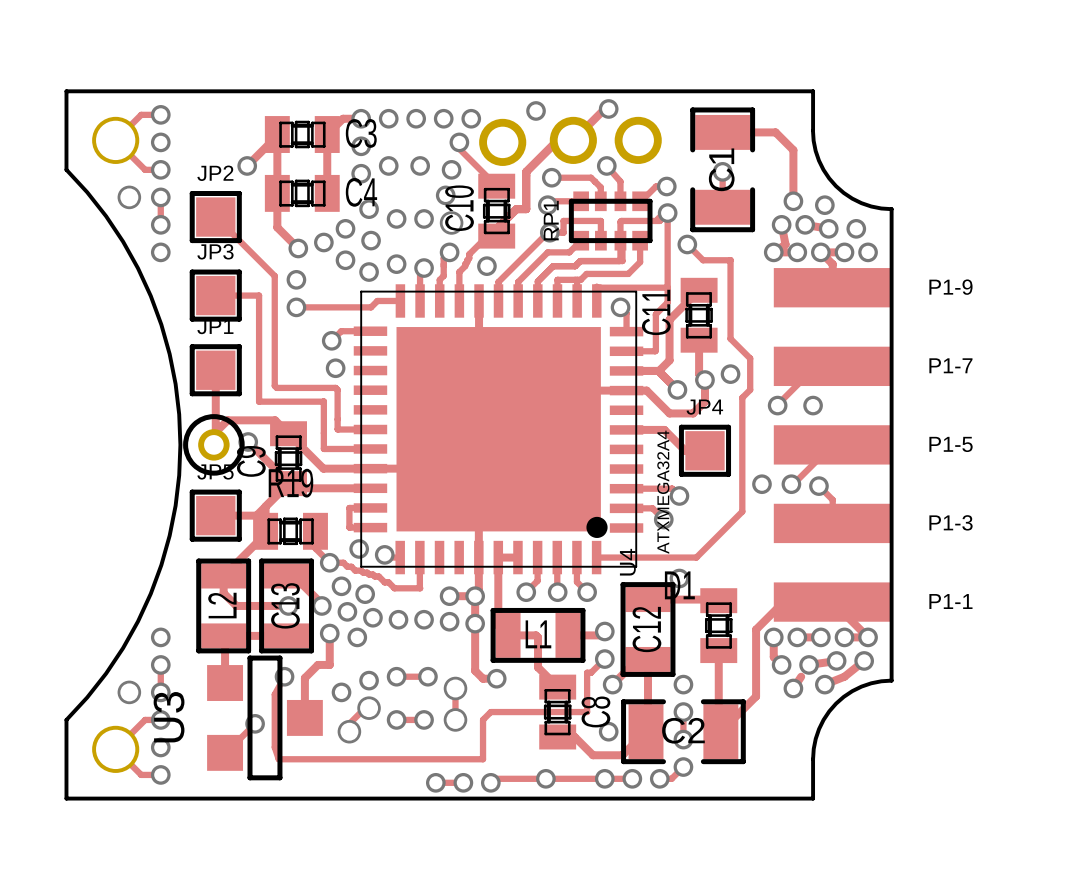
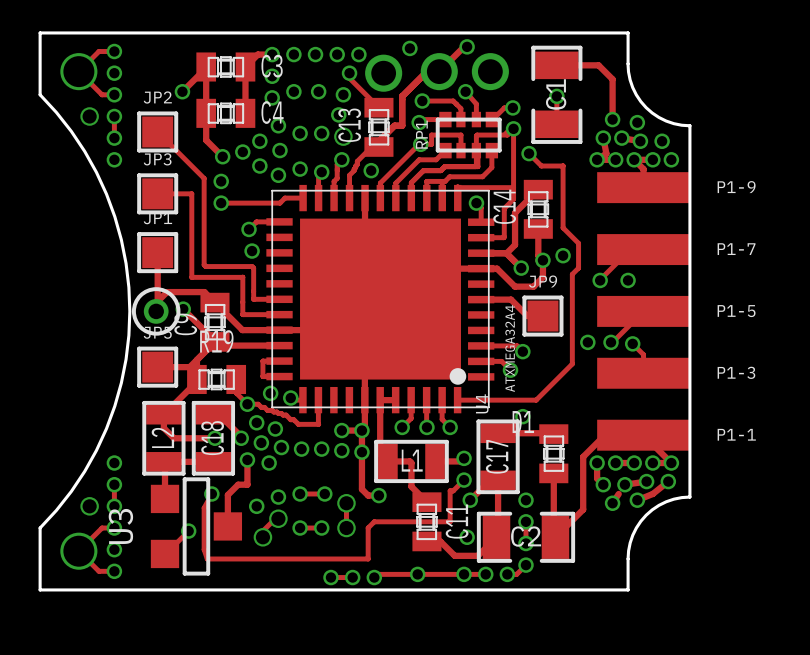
C10 name: C10 (459, 208) -> C13 (349, 125)
C11 name: C11 (656, 312) -> C14 (504, 206)
JP4 name: JP4 (704, 407) -> JP9 (543, 281)
C13 name: C13 (285, 605) -> C18 (212, 438)
C12 name: C12 (646, 629) -> C17 (497, 456)
C8 name: C8 (595, 711) -> C11 (457, 521)

